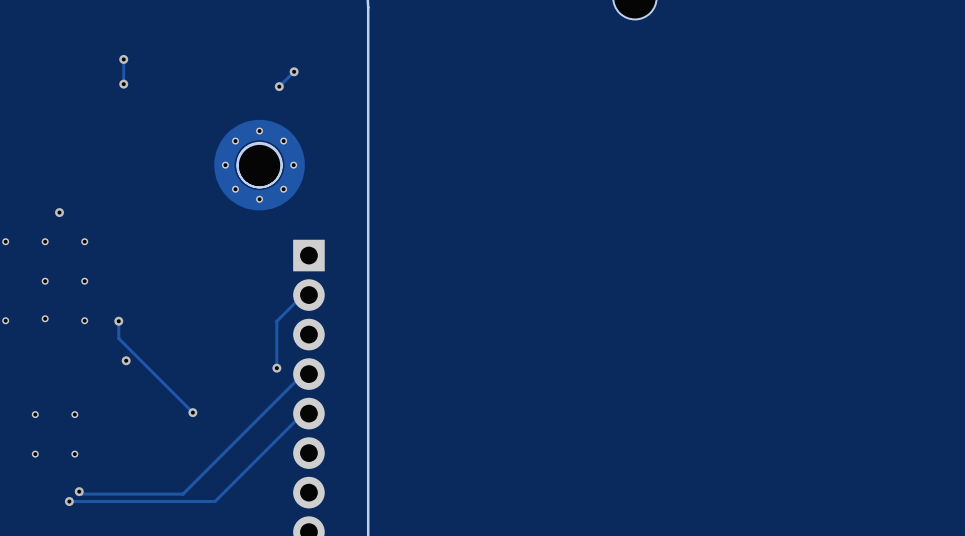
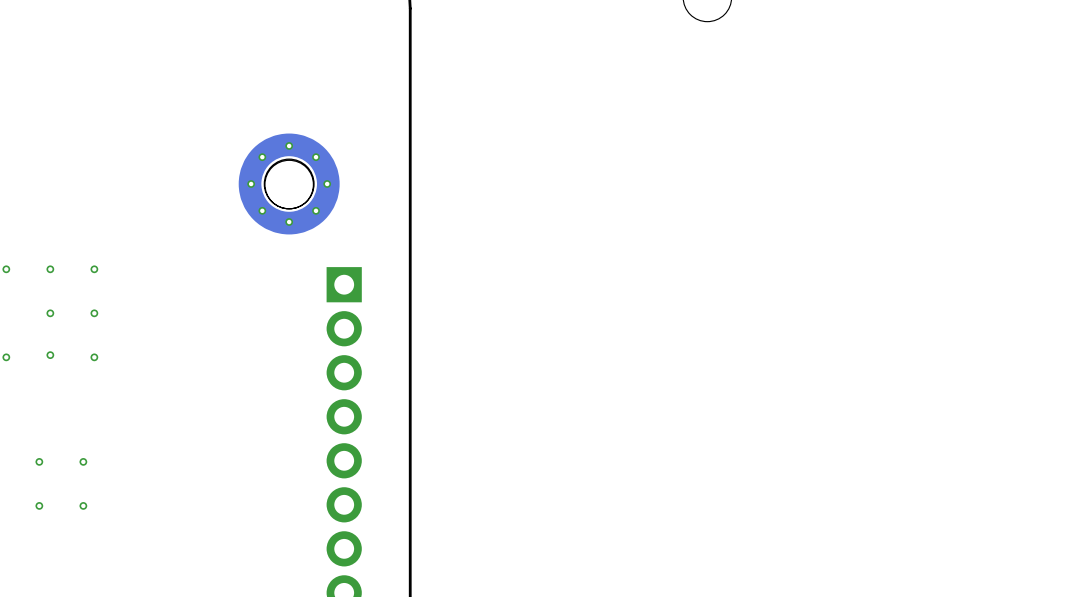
track: (123, 59) (123, 84) -> none
via: (123, 59) -> none
track: (294, 71) (279, 86) -> none
via: (294, 71) -> none
via: (123, 84) -> none
via: (279, 86) -> none
via: (59, 212) -> none
track: (308, 295) (301, 296) (276, 321) (276, 368) -> none
track: (118, 321) (118, 338) (192, 412) -> none
via: (118, 321) -> none
via: (126, 360) -> none
via: (276, 368) -> none
track: (308, 374) (301, 375) (182, 494) (81, 494) (79, 491) -> none
via: (192, 412) -> none
track: (308, 413) (301, 415) (215, 501) (69, 501) -> none
via: (79, 491) -> none
via: (69, 501) -> none

